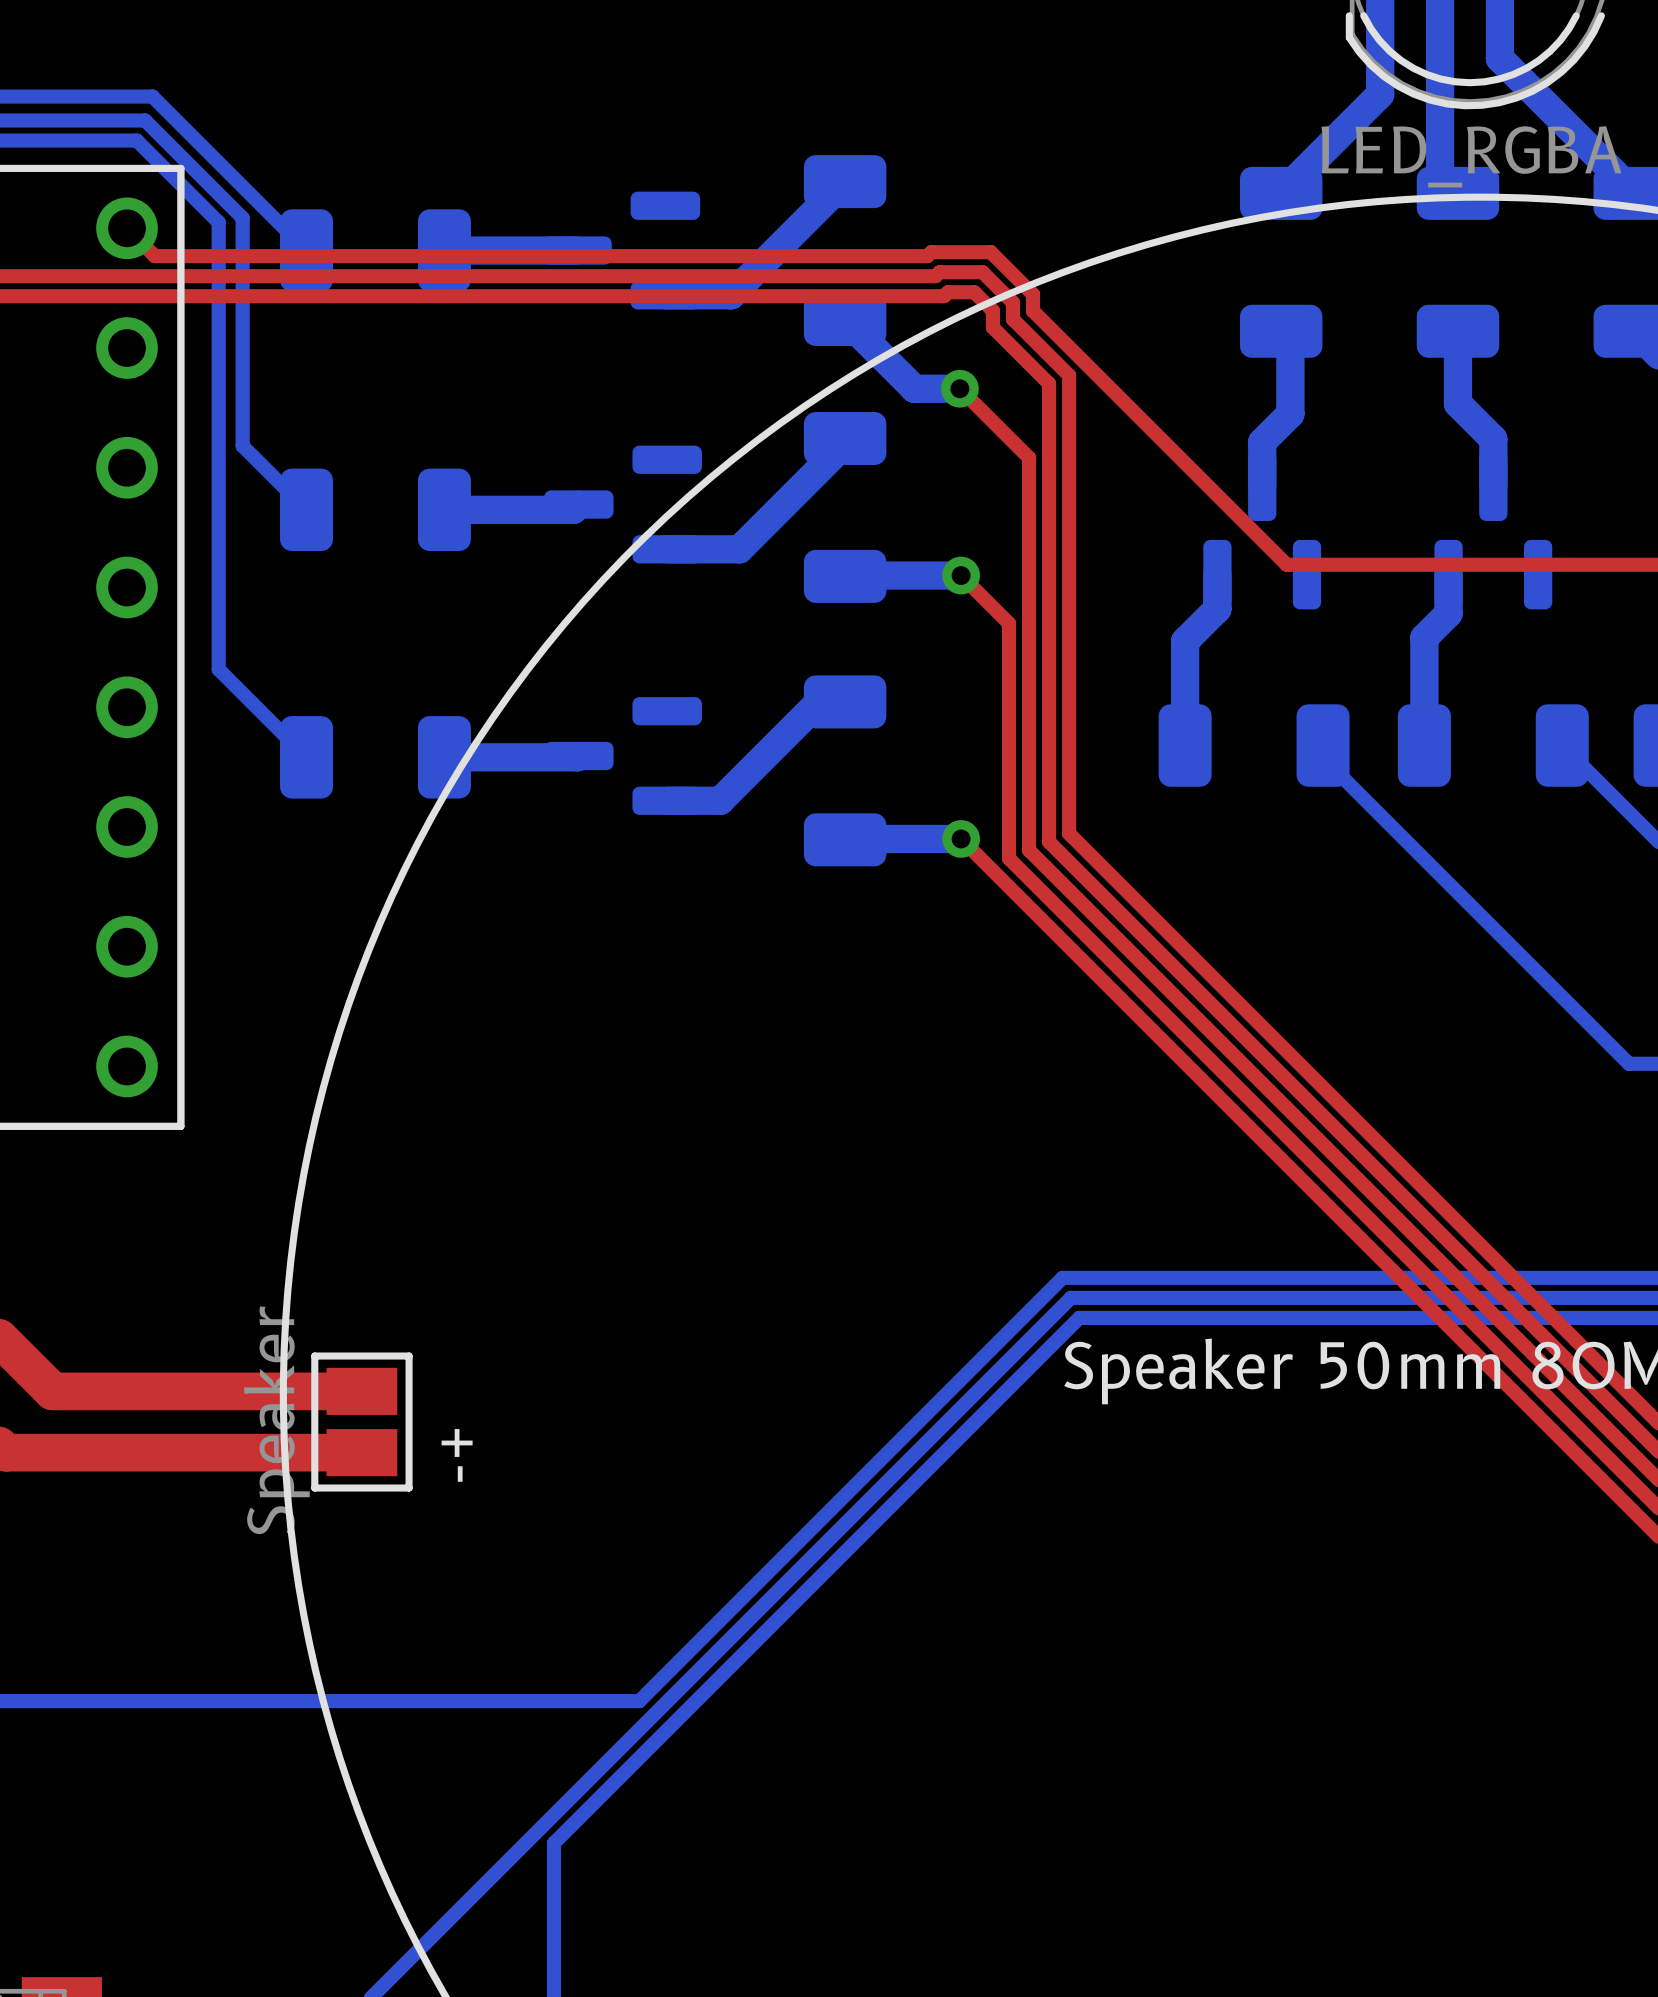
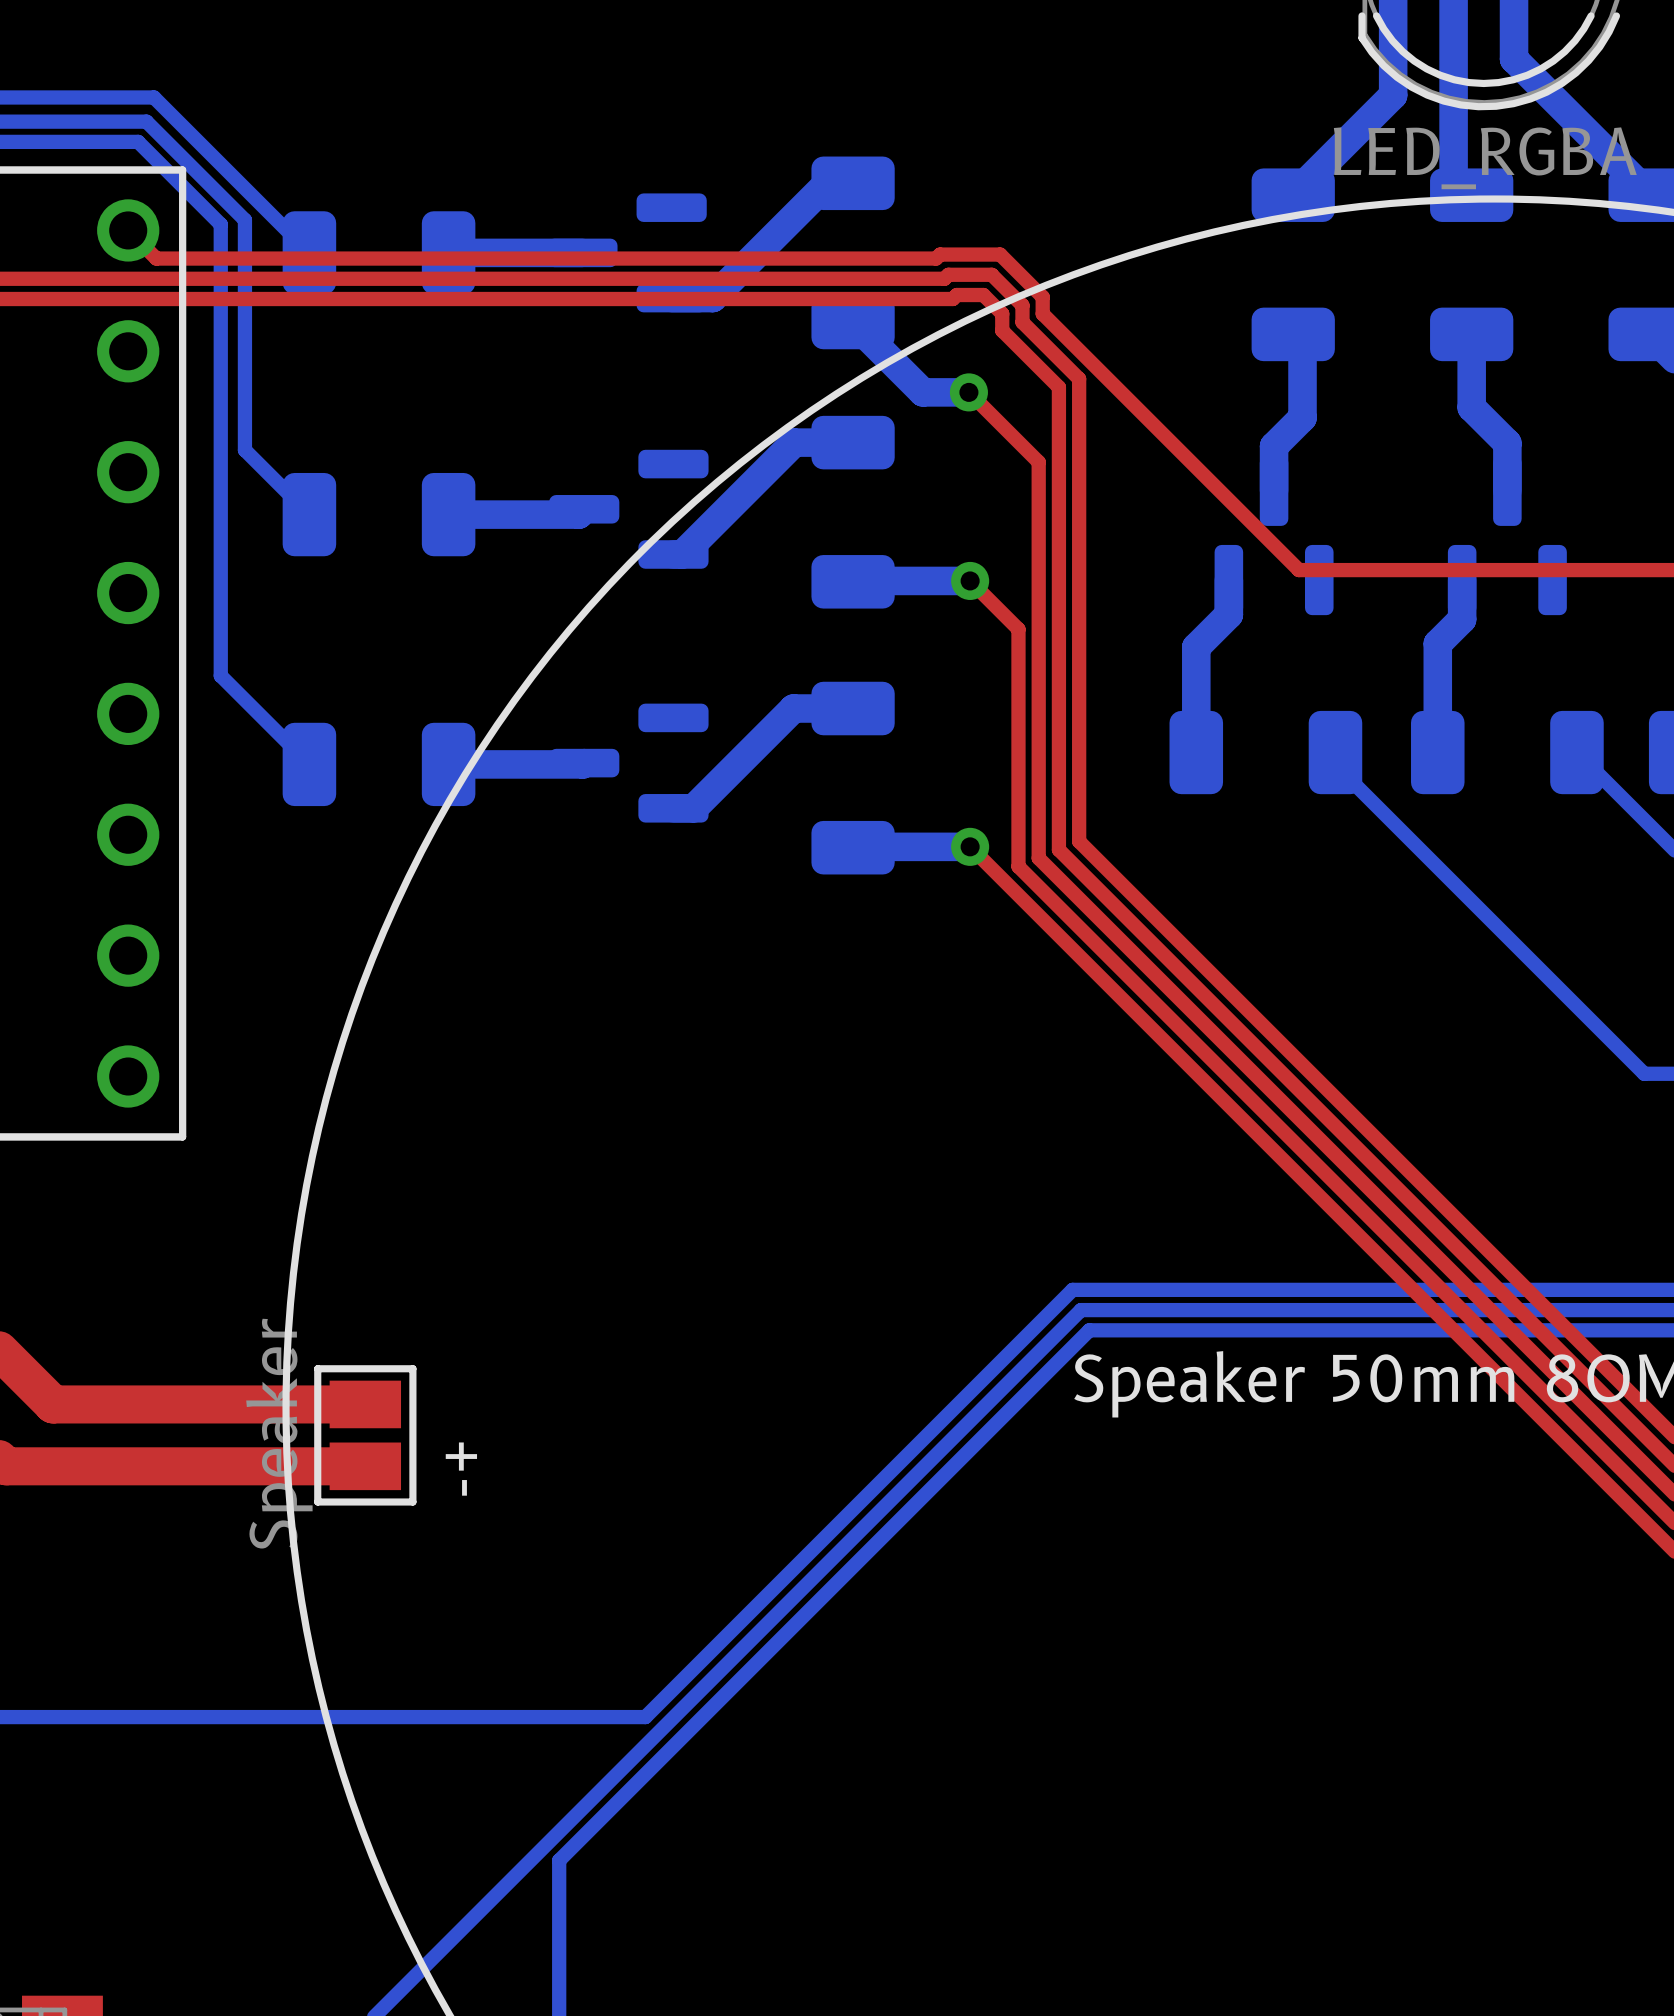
bottom track: (844, 181) (731, 295) (706, 295) -> (852, 183) (827, 183) (712, 298)
bottom track: (845, 438) (845, 443) (739, 549) (675, 549) -> (853, 442) (794, 442) (682, 554)
bottom track: (819, 701) (720, 800) (687, 800) -> (826, 708) (793, 708) (693, 808)

